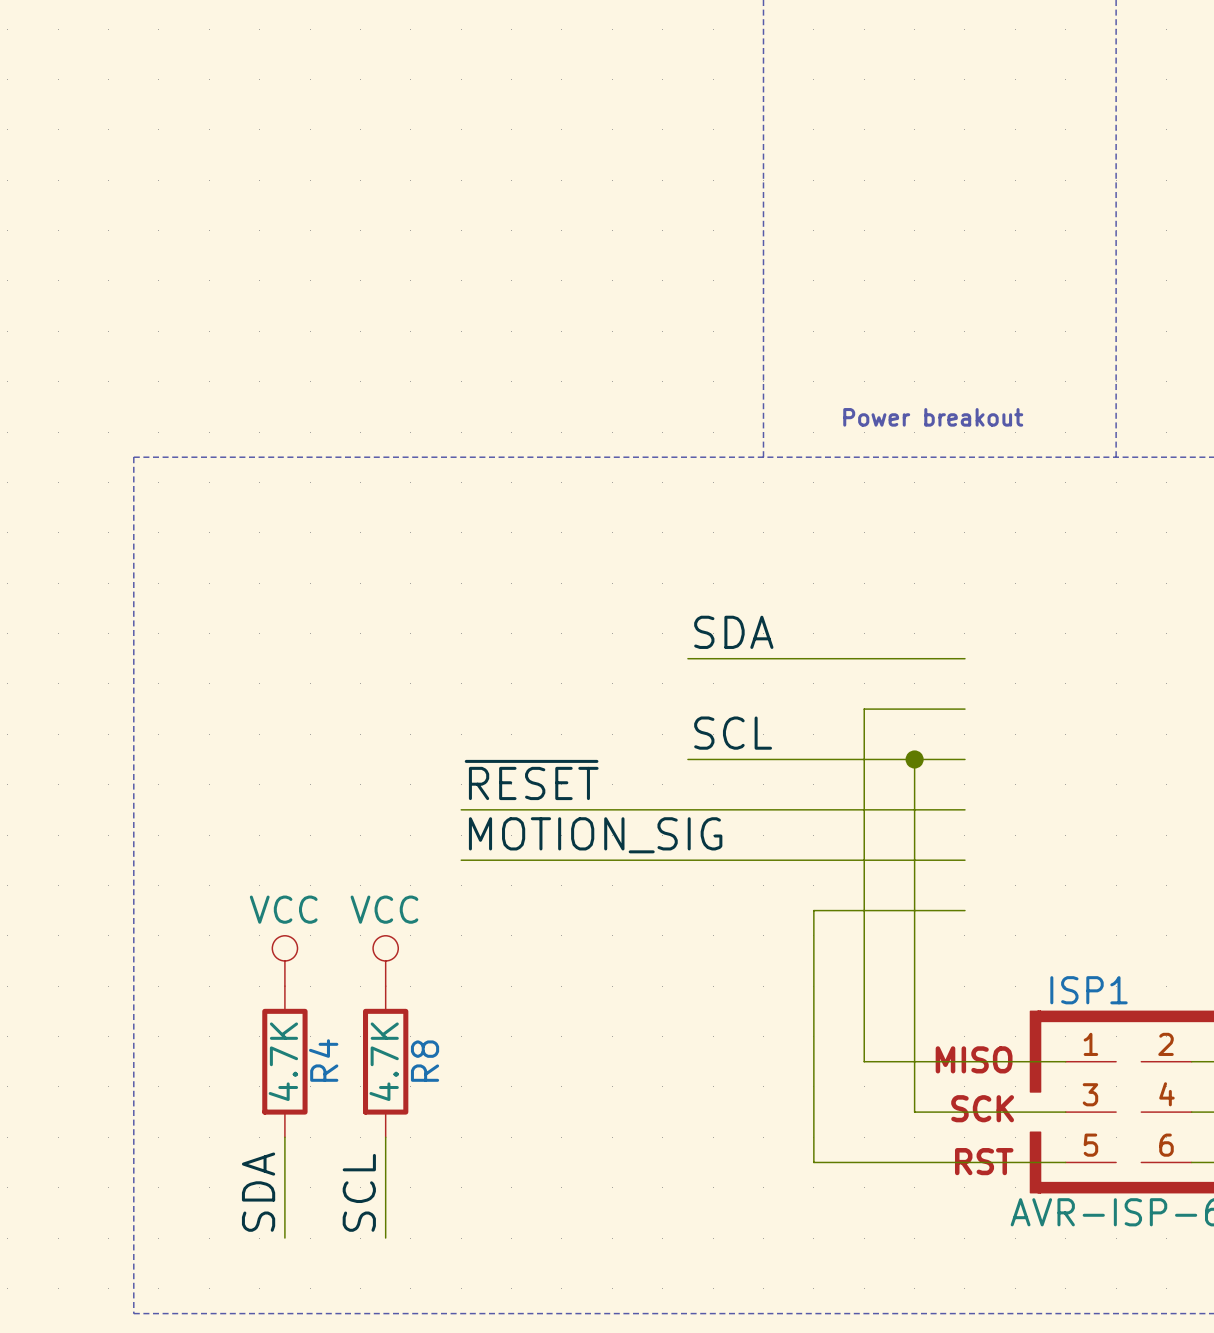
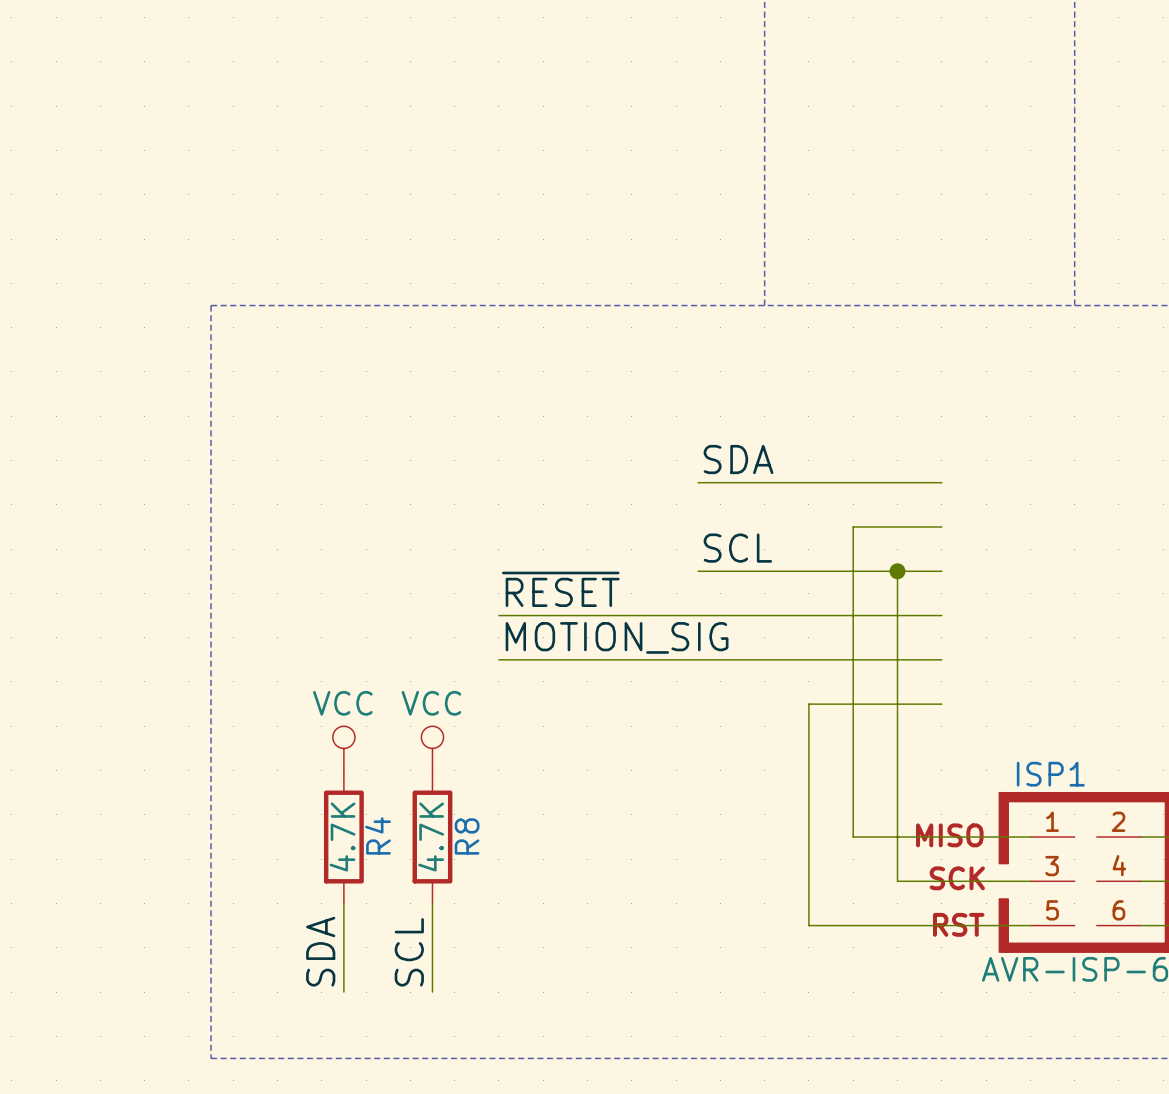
text: Power breakout (933, 417) -> none

